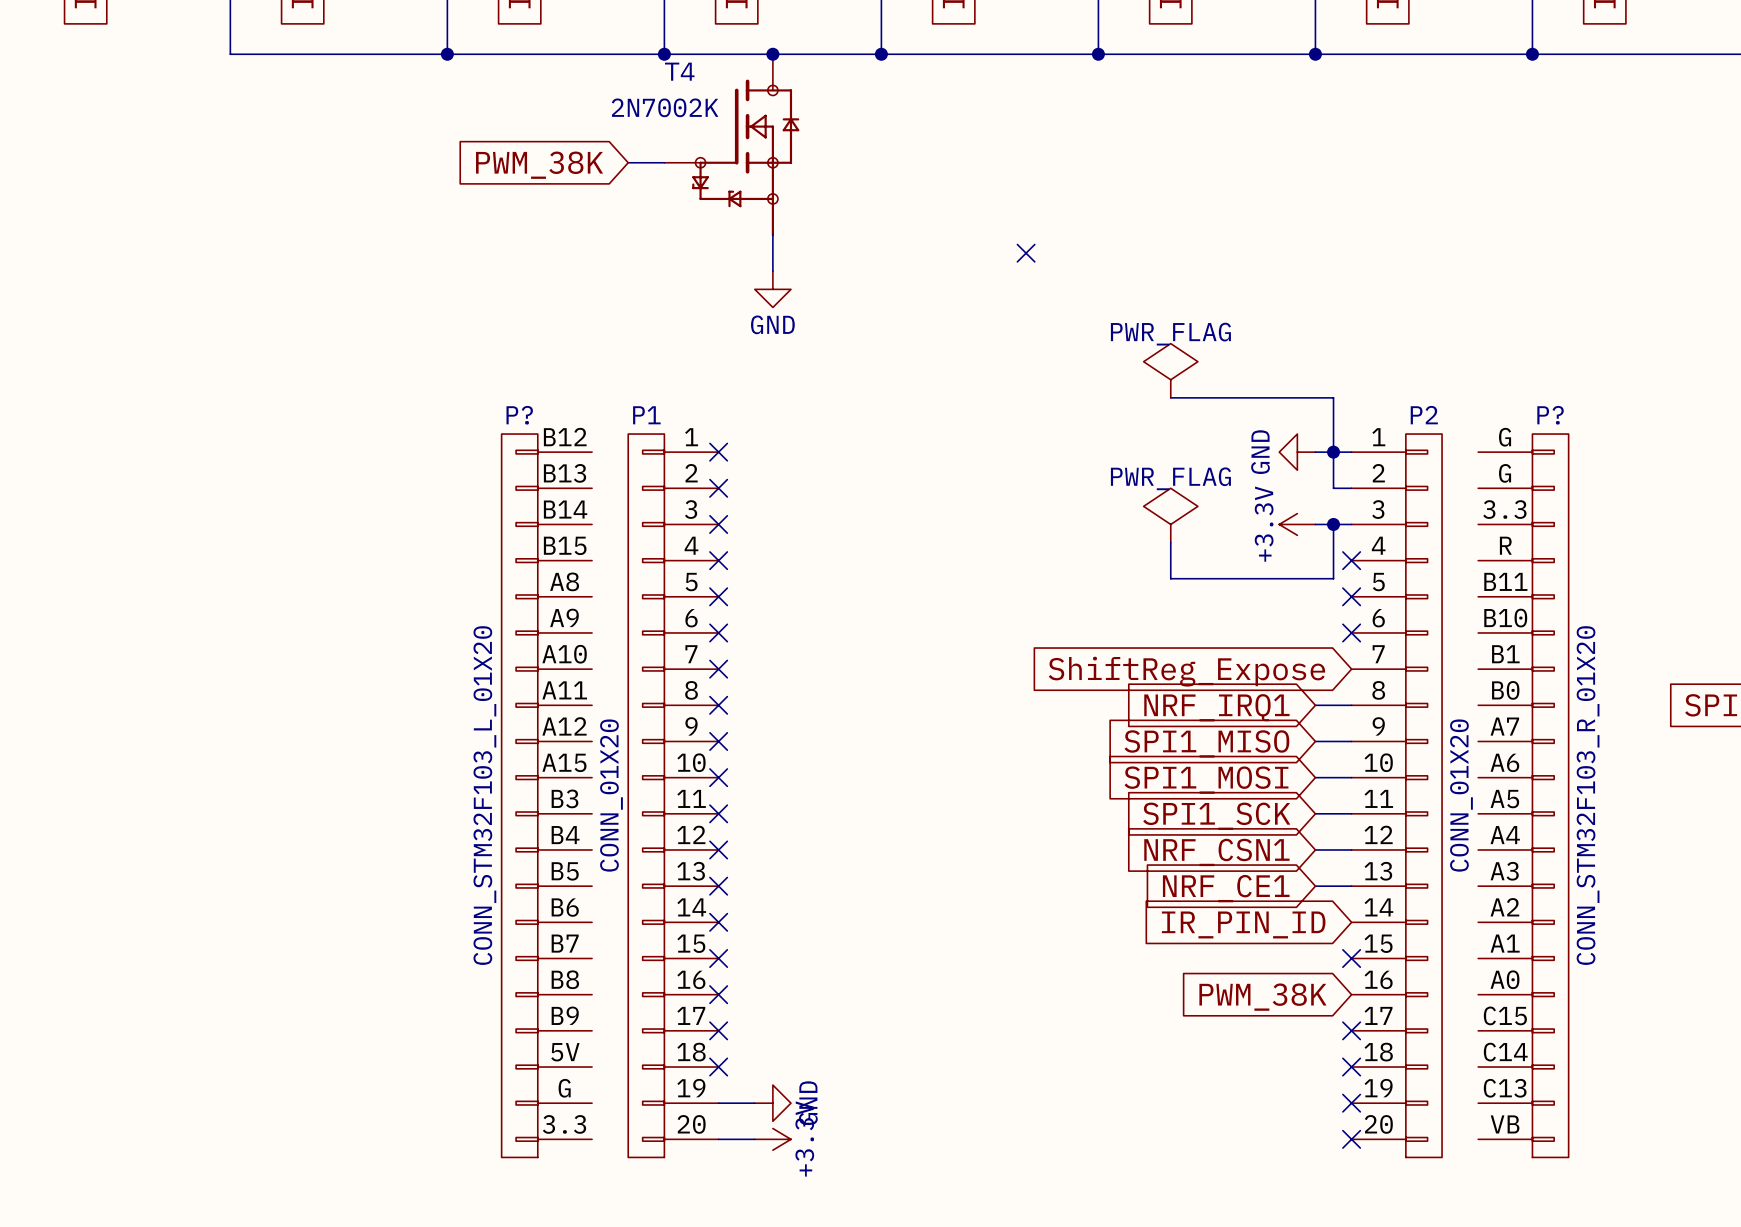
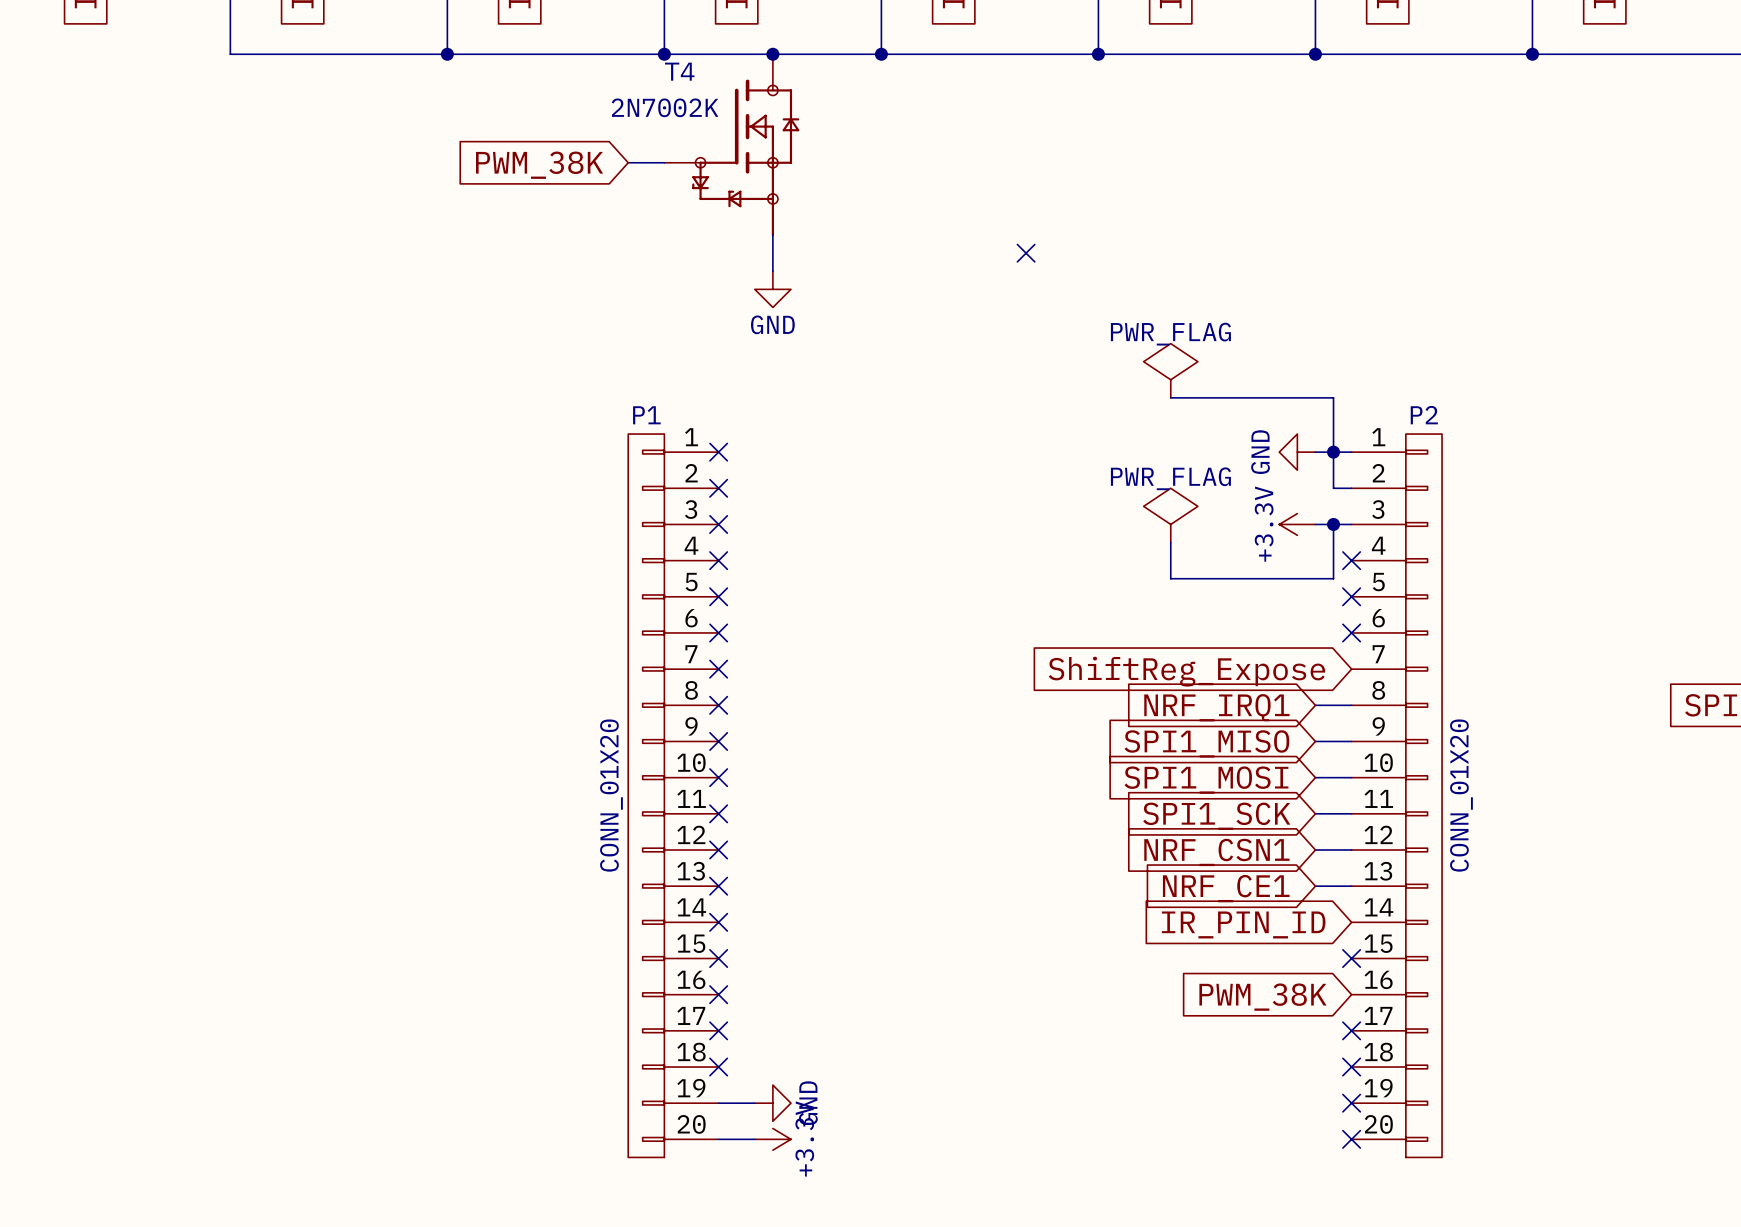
P?: CONN_STM32F103_L_01X20 (546, 795) -> none
P?: CONN_STM32F103_R_01X20 (1523, 795) -> none

